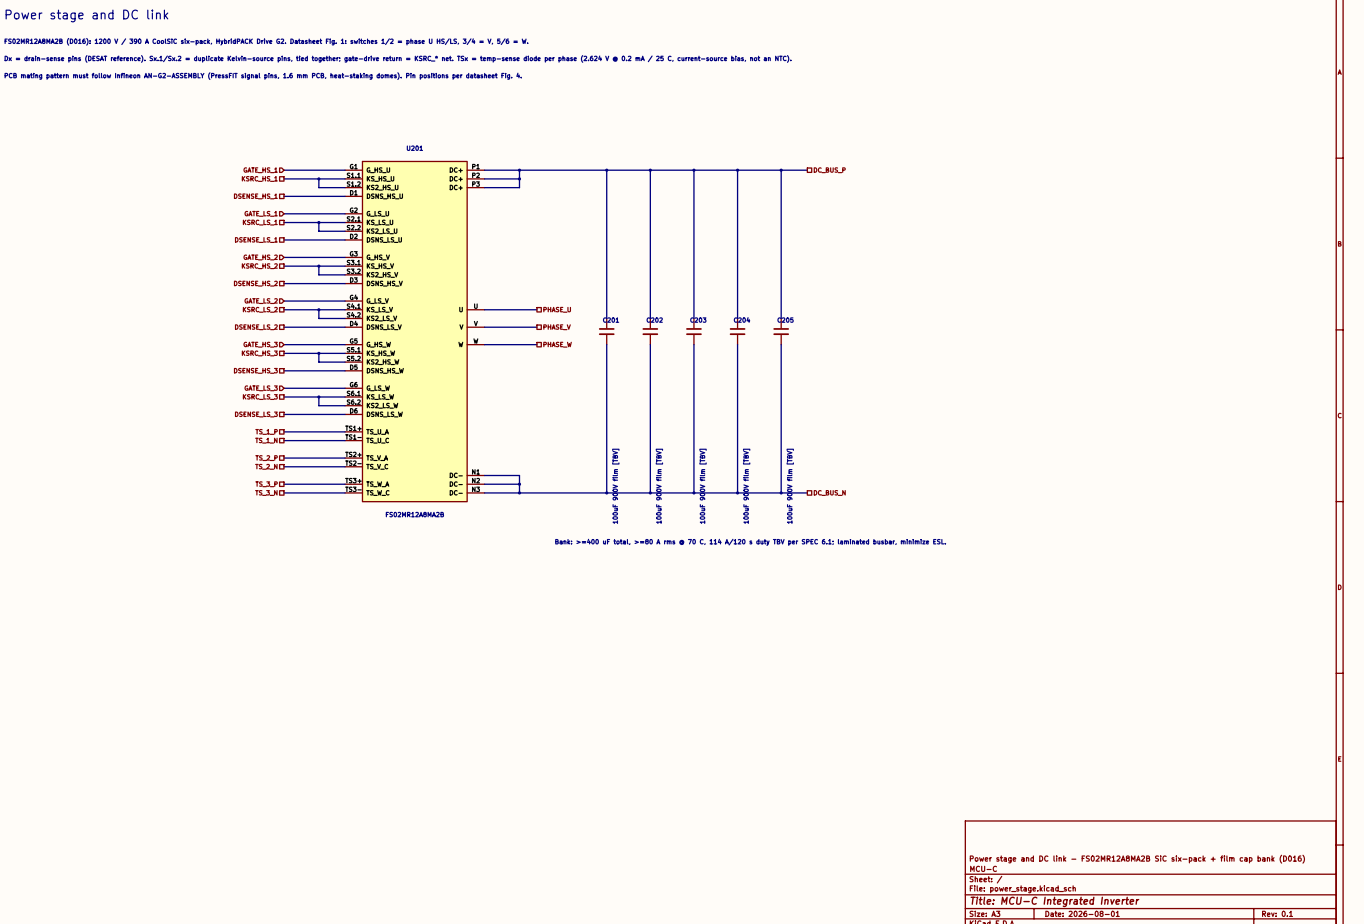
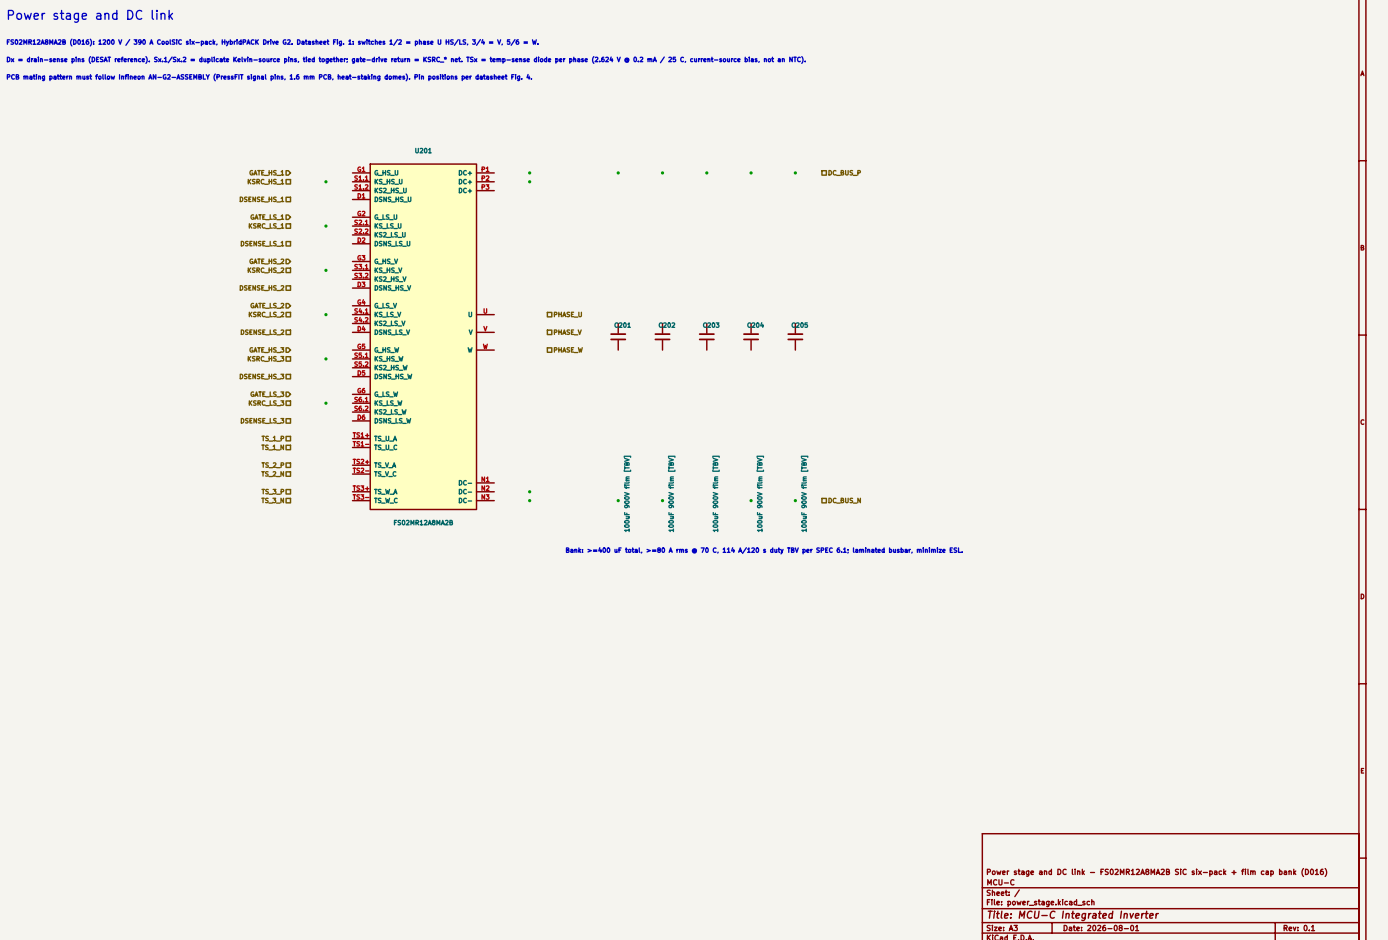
wire: (283, 170) (345, 170) -> none
wire: (484, 170) (807, 170) -> none
wire: (519, 170) (519, 187) (484, 187) -> none
wire: (606, 170) (606, 318) -> none
wire: (650, 170) (650, 318) -> none
wire: (693, 170) (693, 318) -> none
wire: (737, 170) (737, 318) -> none
wire: (781, 170) (781, 318) -> none
wire: (283, 178) (345, 178) -> none
wire: (318, 178) (318, 187) (345, 187) -> none
wire: (484, 178) (519, 178) -> none
wire: (283, 196) (345, 196) -> none
wire: (283, 213) (345, 213) -> none
wire: (283, 222) (345, 222) -> none
wire: (318, 222) (318, 231) (345, 231) -> none
wire: (283, 239) (345, 239) -> none
wire: (283, 257) (345, 257) -> none
wire: (283, 266) (345, 266) -> none
wire: (318, 266) (318, 274) (345, 274) -> none
wire: (283, 283) (345, 283) -> none
wire: (283, 301) (345, 301) -> none
wire: (283, 309) (345, 309) -> none
wire: (318, 309) (318, 318) (345, 318) -> none
wire: (484, 309) (536, 309) -> none
wire: (283, 327) (345, 327) -> none
wire: (484, 327) (536, 327) -> none
wire: (283, 344) (345, 344) -> none
wire: (484, 344) (536, 344) -> none
wire: (606, 344) (606, 492) -> none
wire: (650, 344) (650, 492) -> none
wire: (693, 344) (693, 492) -> none
wire: (737, 344) (737, 492) -> none
wire: (781, 344) (781, 492) -> none
wire: (283, 353) (345, 353) -> none
wire: (318, 353) (318, 362) (345, 362) -> none
wire: (283, 370) (345, 370) -> none
wire: (283, 388) (345, 388) -> none
wire: (283, 396) (345, 396) -> none
wire: (318, 396) (318, 405) (345, 405) -> none
wire: (283, 414) (345, 414) -> none
wire: (283, 431) (345, 431) -> none
wire: (283, 440) (345, 440) -> none
wire: (283, 458) (345, 458) -> none
wire: (283, 466) (345, 466) -> none
wire: (484, 475) (519, 475) (519, 492) -> none
wire: (283, 484) (345, 484) -> none
wire: (484, 484) (519, 484) -> none
wire: (283, 492) (345, 492) -> none
wire: (484, 492) (807, 492) -> none

